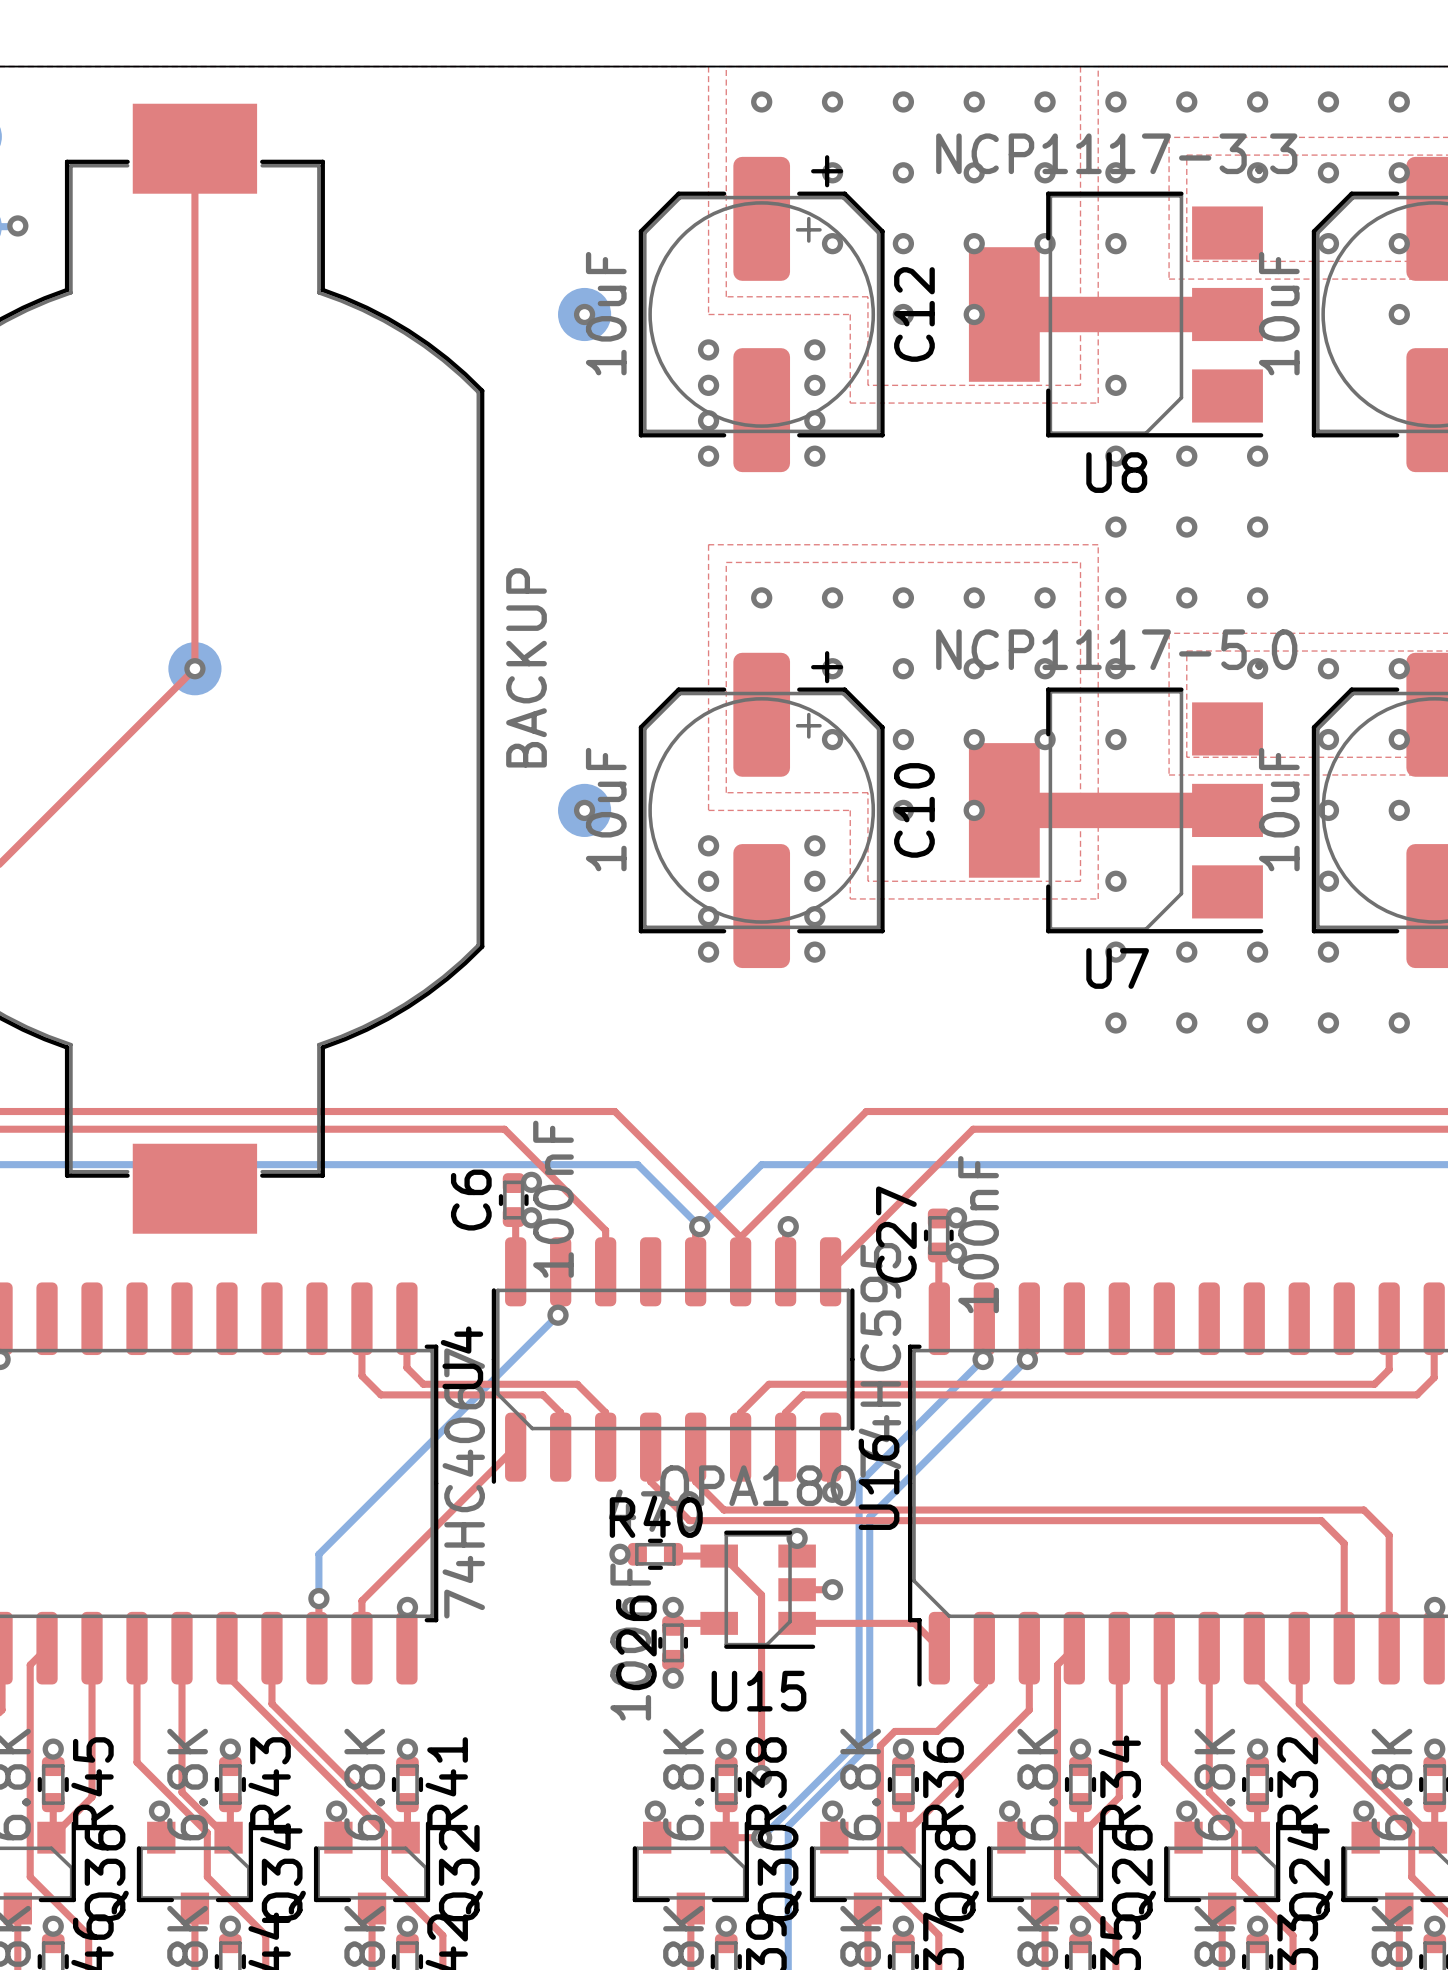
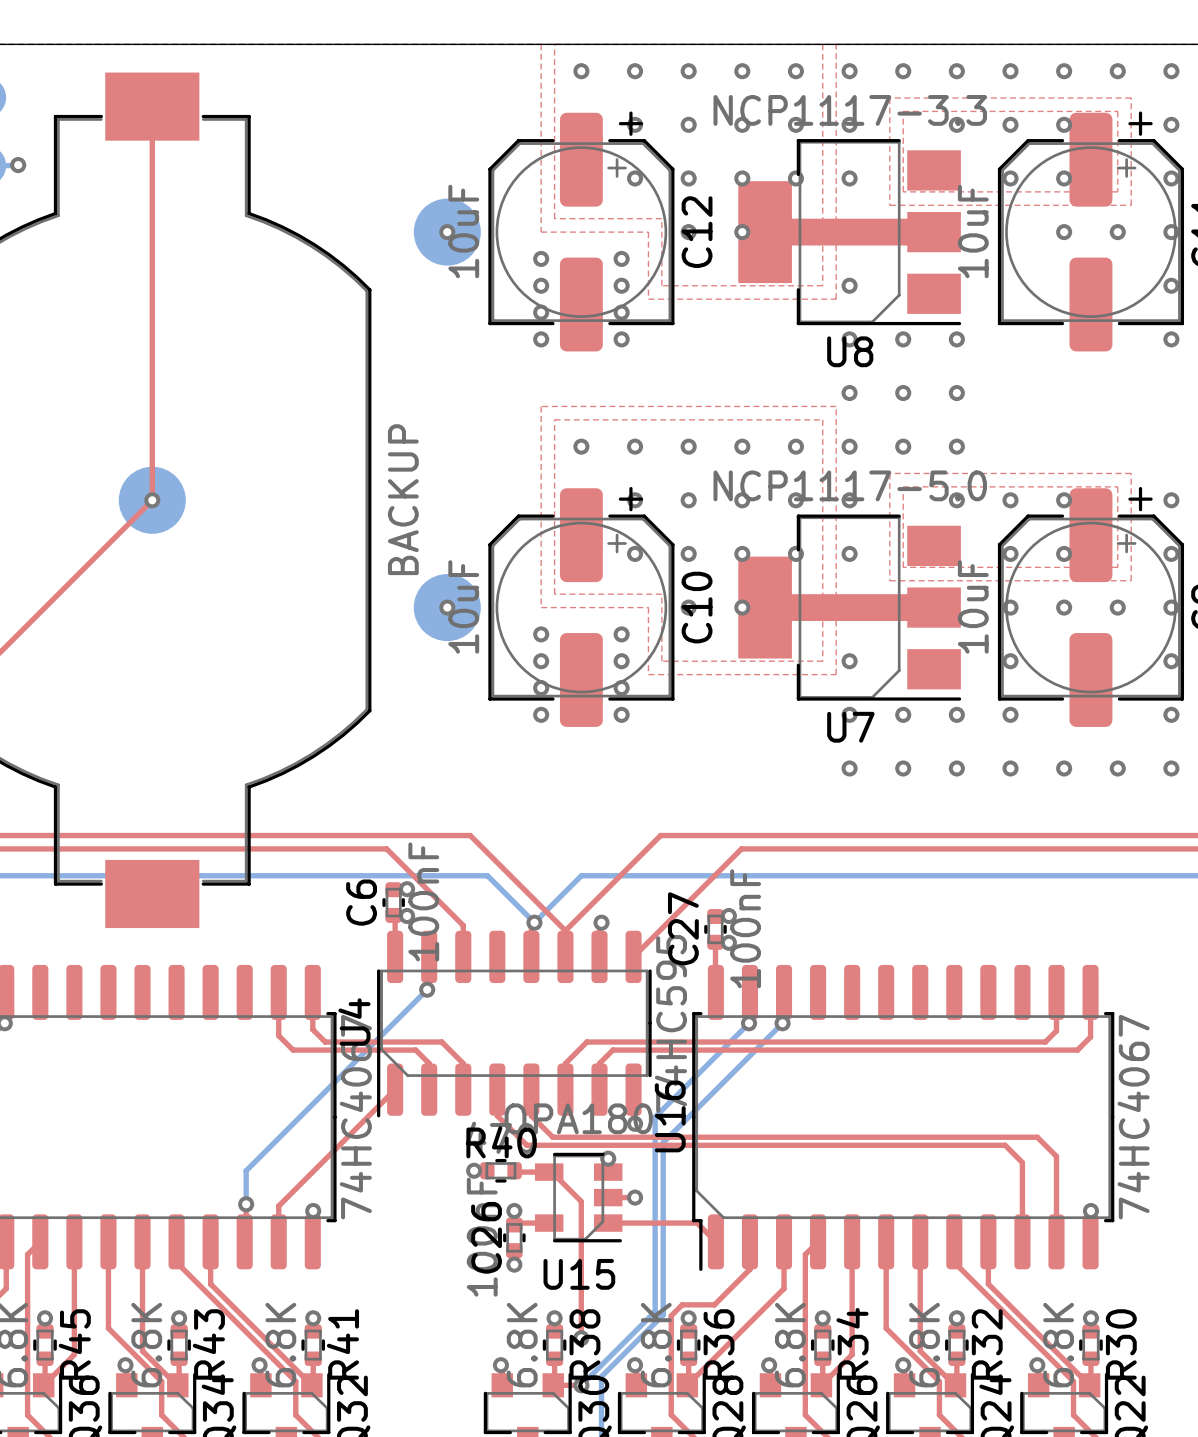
part footprint: [558, 287, 612, 342] -> [413, 198, 481, 266]
part footprint: [168, 642, 222, 696] -> [118, 466, 186, 534]
part footprint: [558, 783, 612, 837] -> [413, 574, 481, 642]

